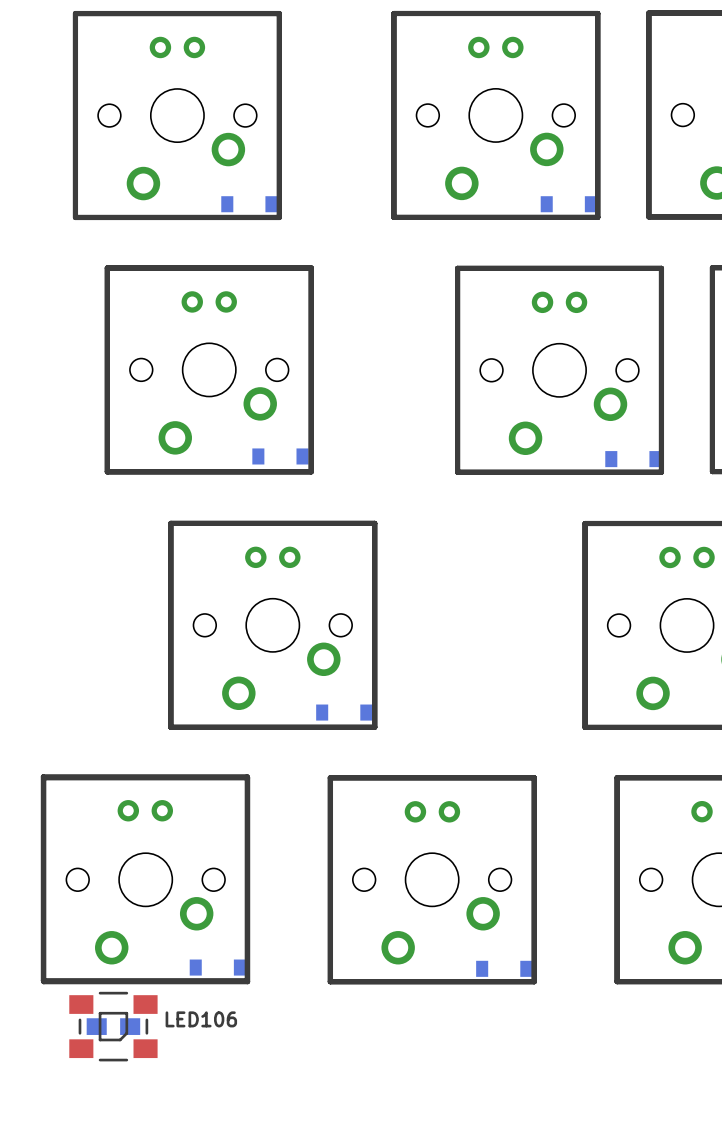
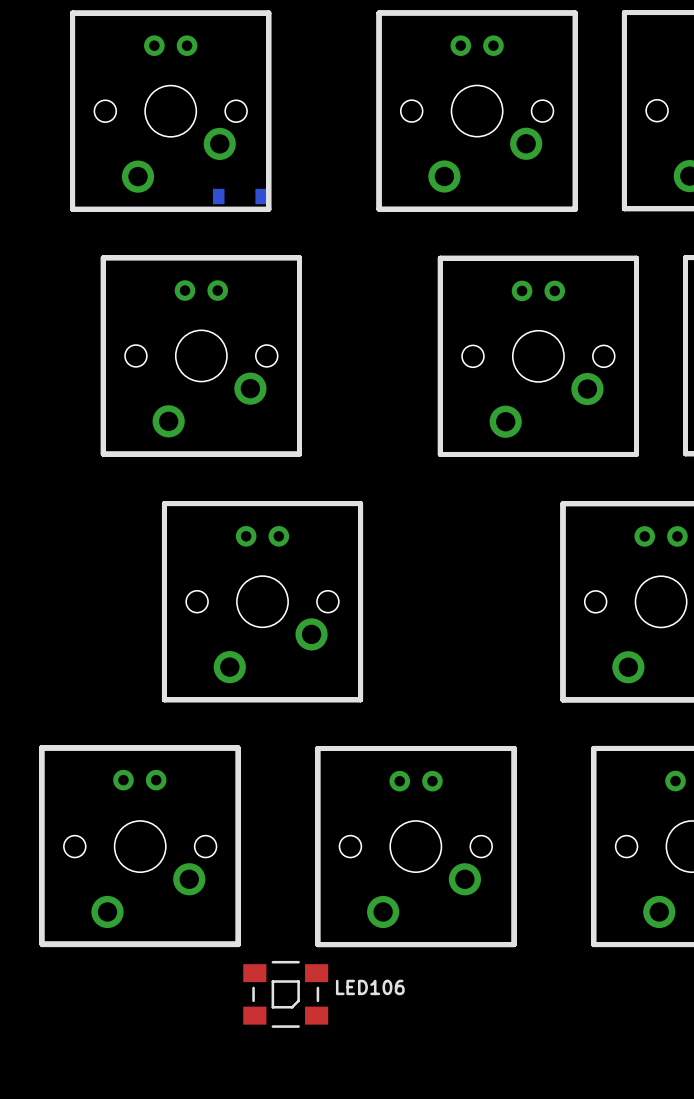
part: (568, 204) -> none
part: (280, 456) -> none
part: (633, 459) -> none
part: (344, 712) -> none
part: (217, 967) -> none
part: (504, 968) -> none
LED106 position: (113, 1026) -> (285, 994)
part: (113, 1026) -> none

